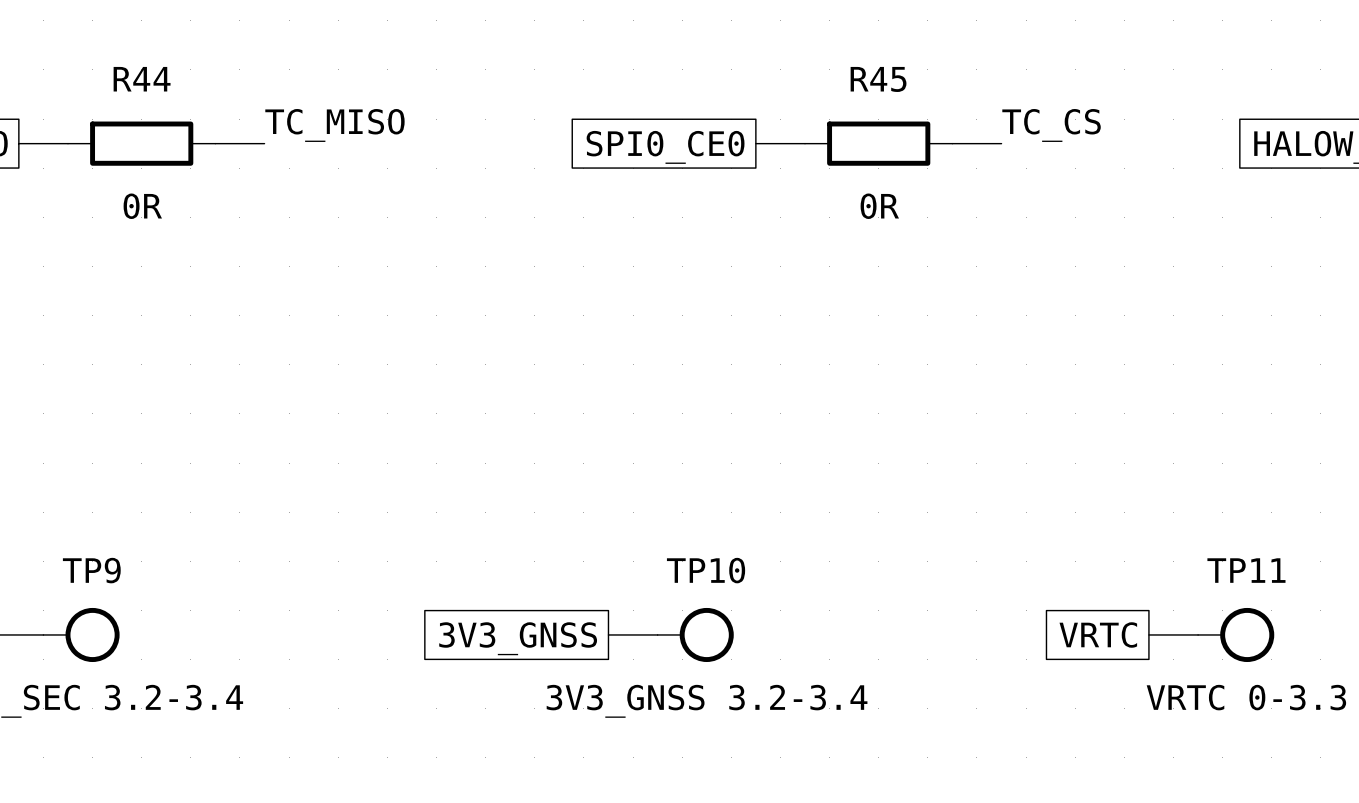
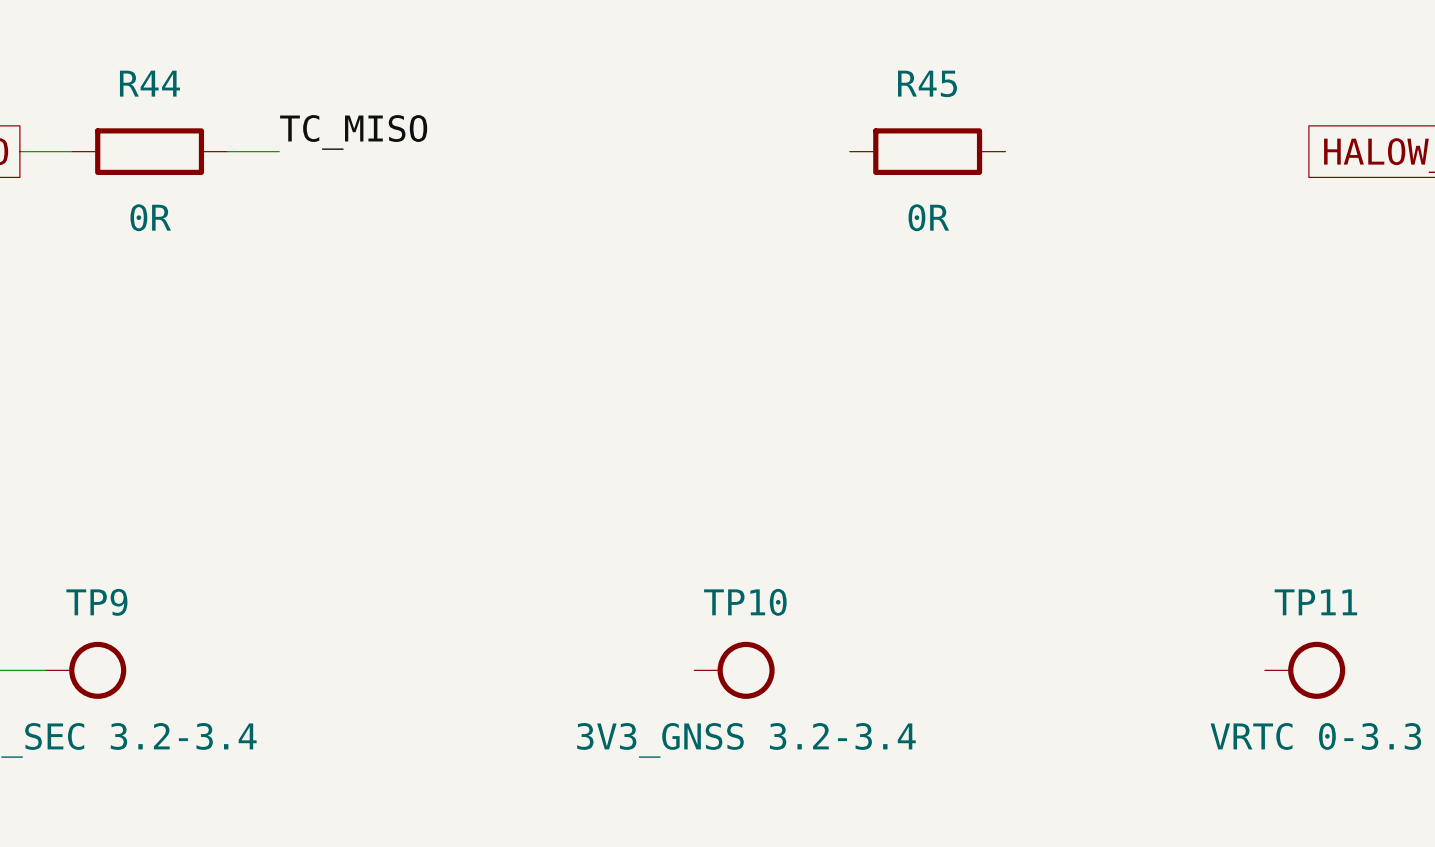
label: TC_CS (1051, 125) -> none
wire: (755, 143) (805, 143) -> none
wire: (952, 143) (1001, 143) -> none
global label: SPI0_CE0 (665, 147) -> none
wire: (608, 634) (657, 634) -> none
wire: (1148, 634) (1198, 634) -> none
global label: VRTC (1098, 635) -> none
global label: 3V3_GNSS (518, 638) -> none

